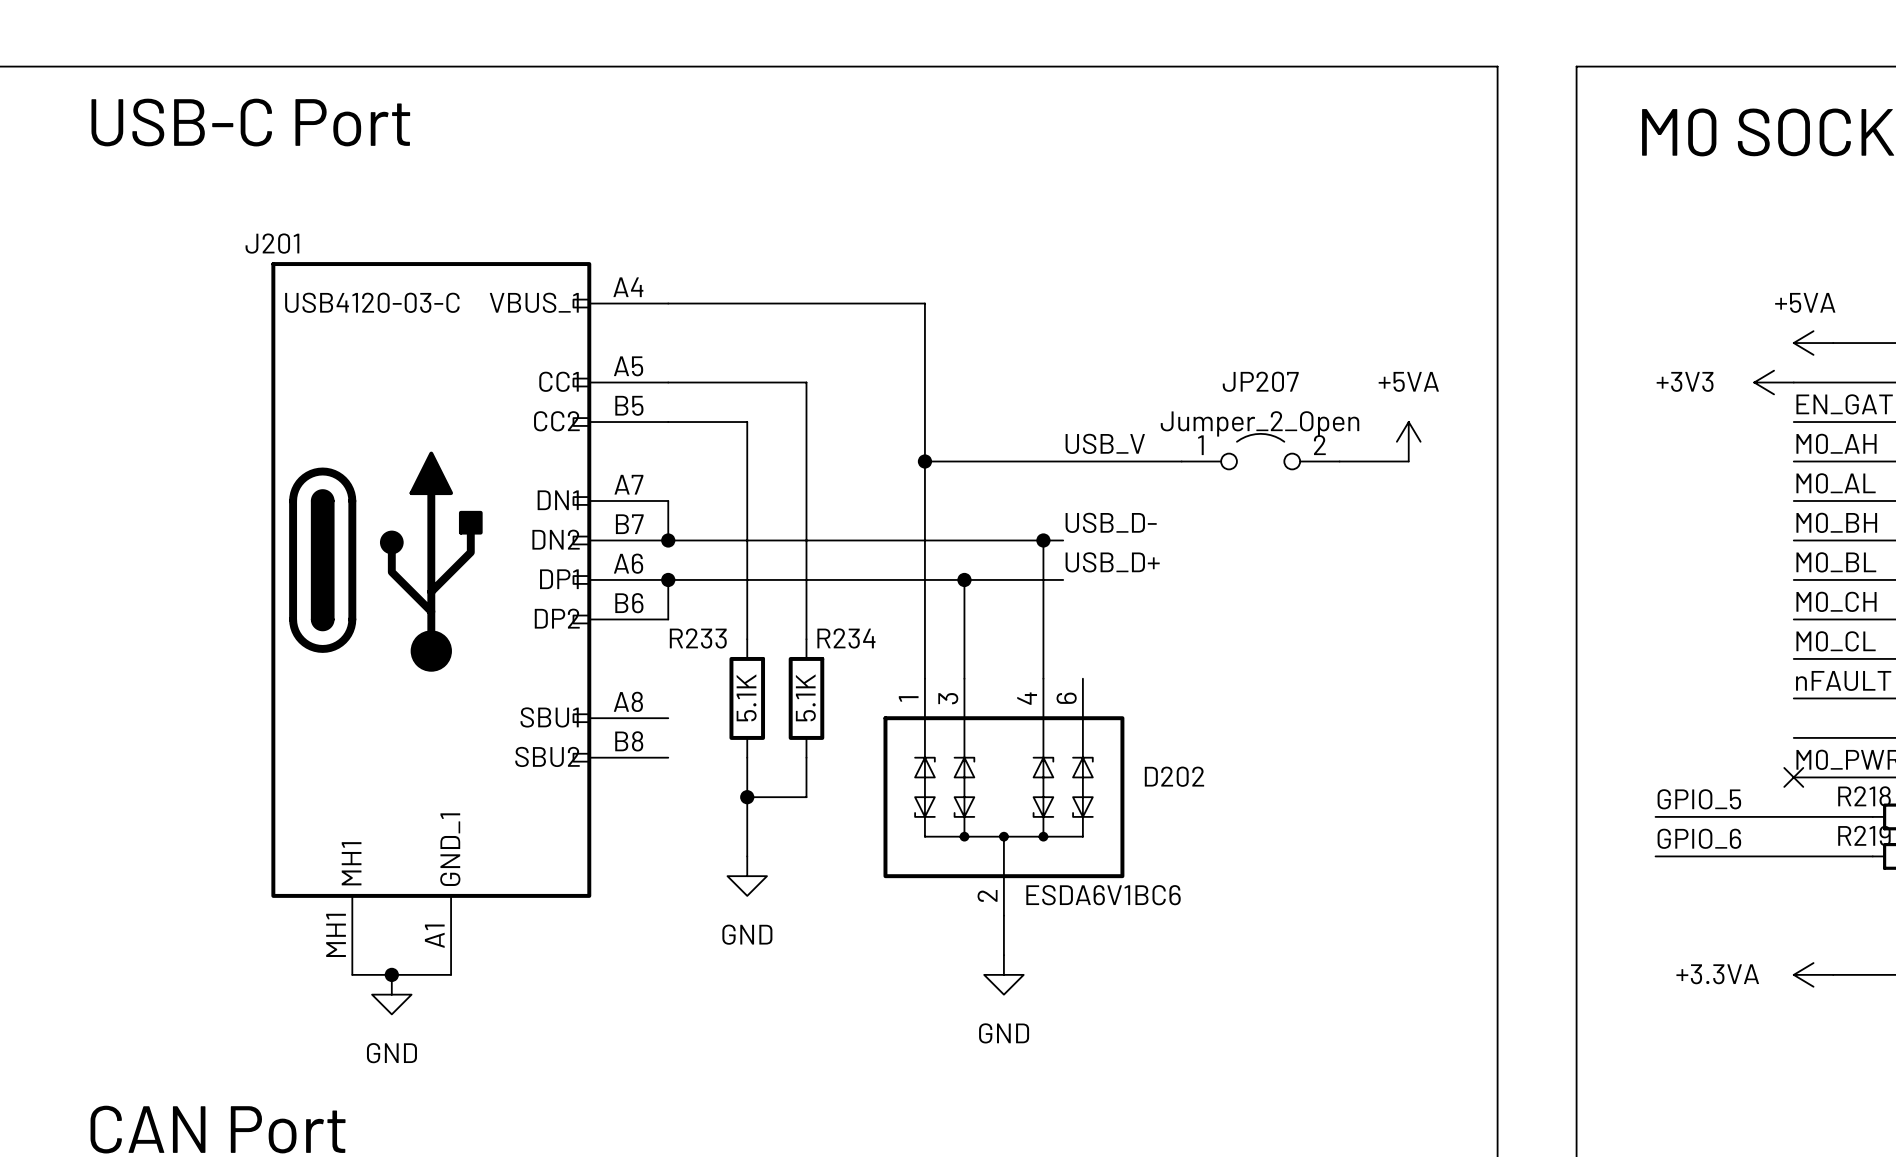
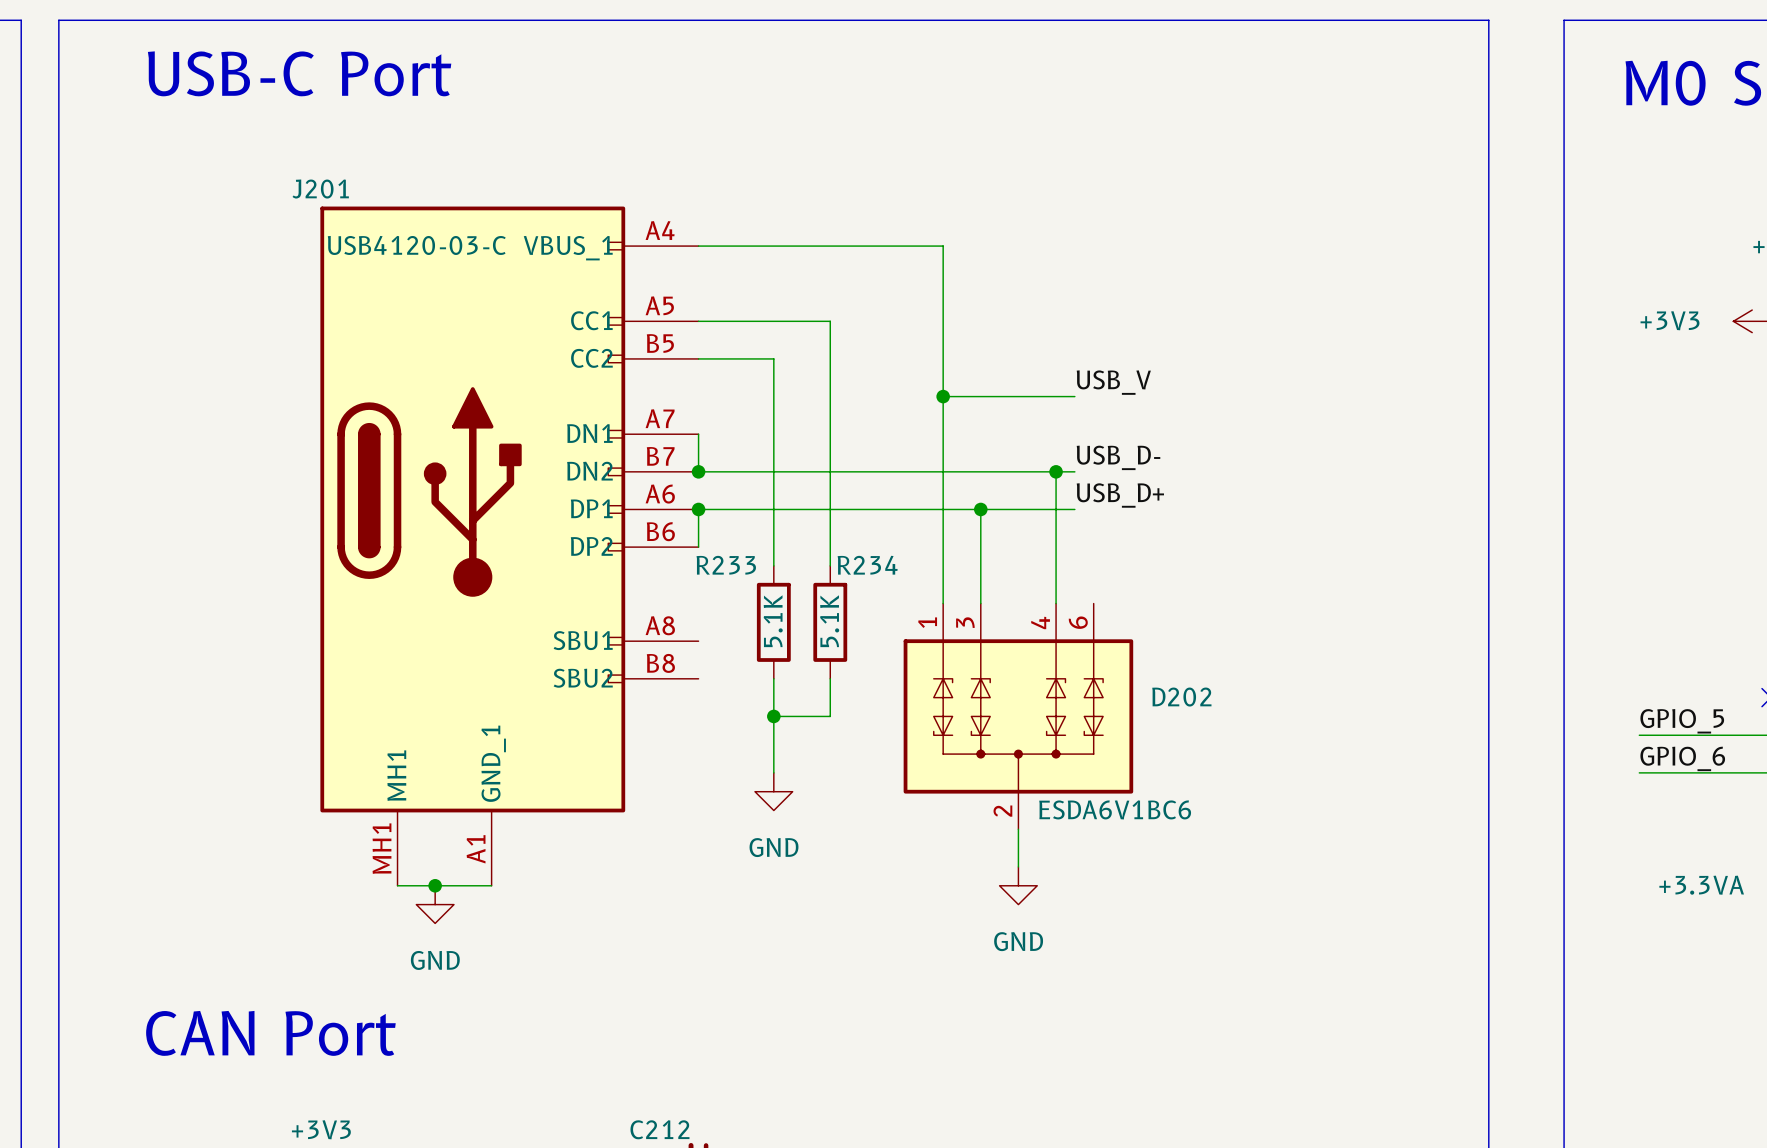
power symbol: +5VA (1408, 441) -> none
JP207: Jumper_2_Open (1260, 451) -> none
wire: (1063, 461) (1181, 461) -> none
wire: (1339, 461) (1408, 461) -> none

